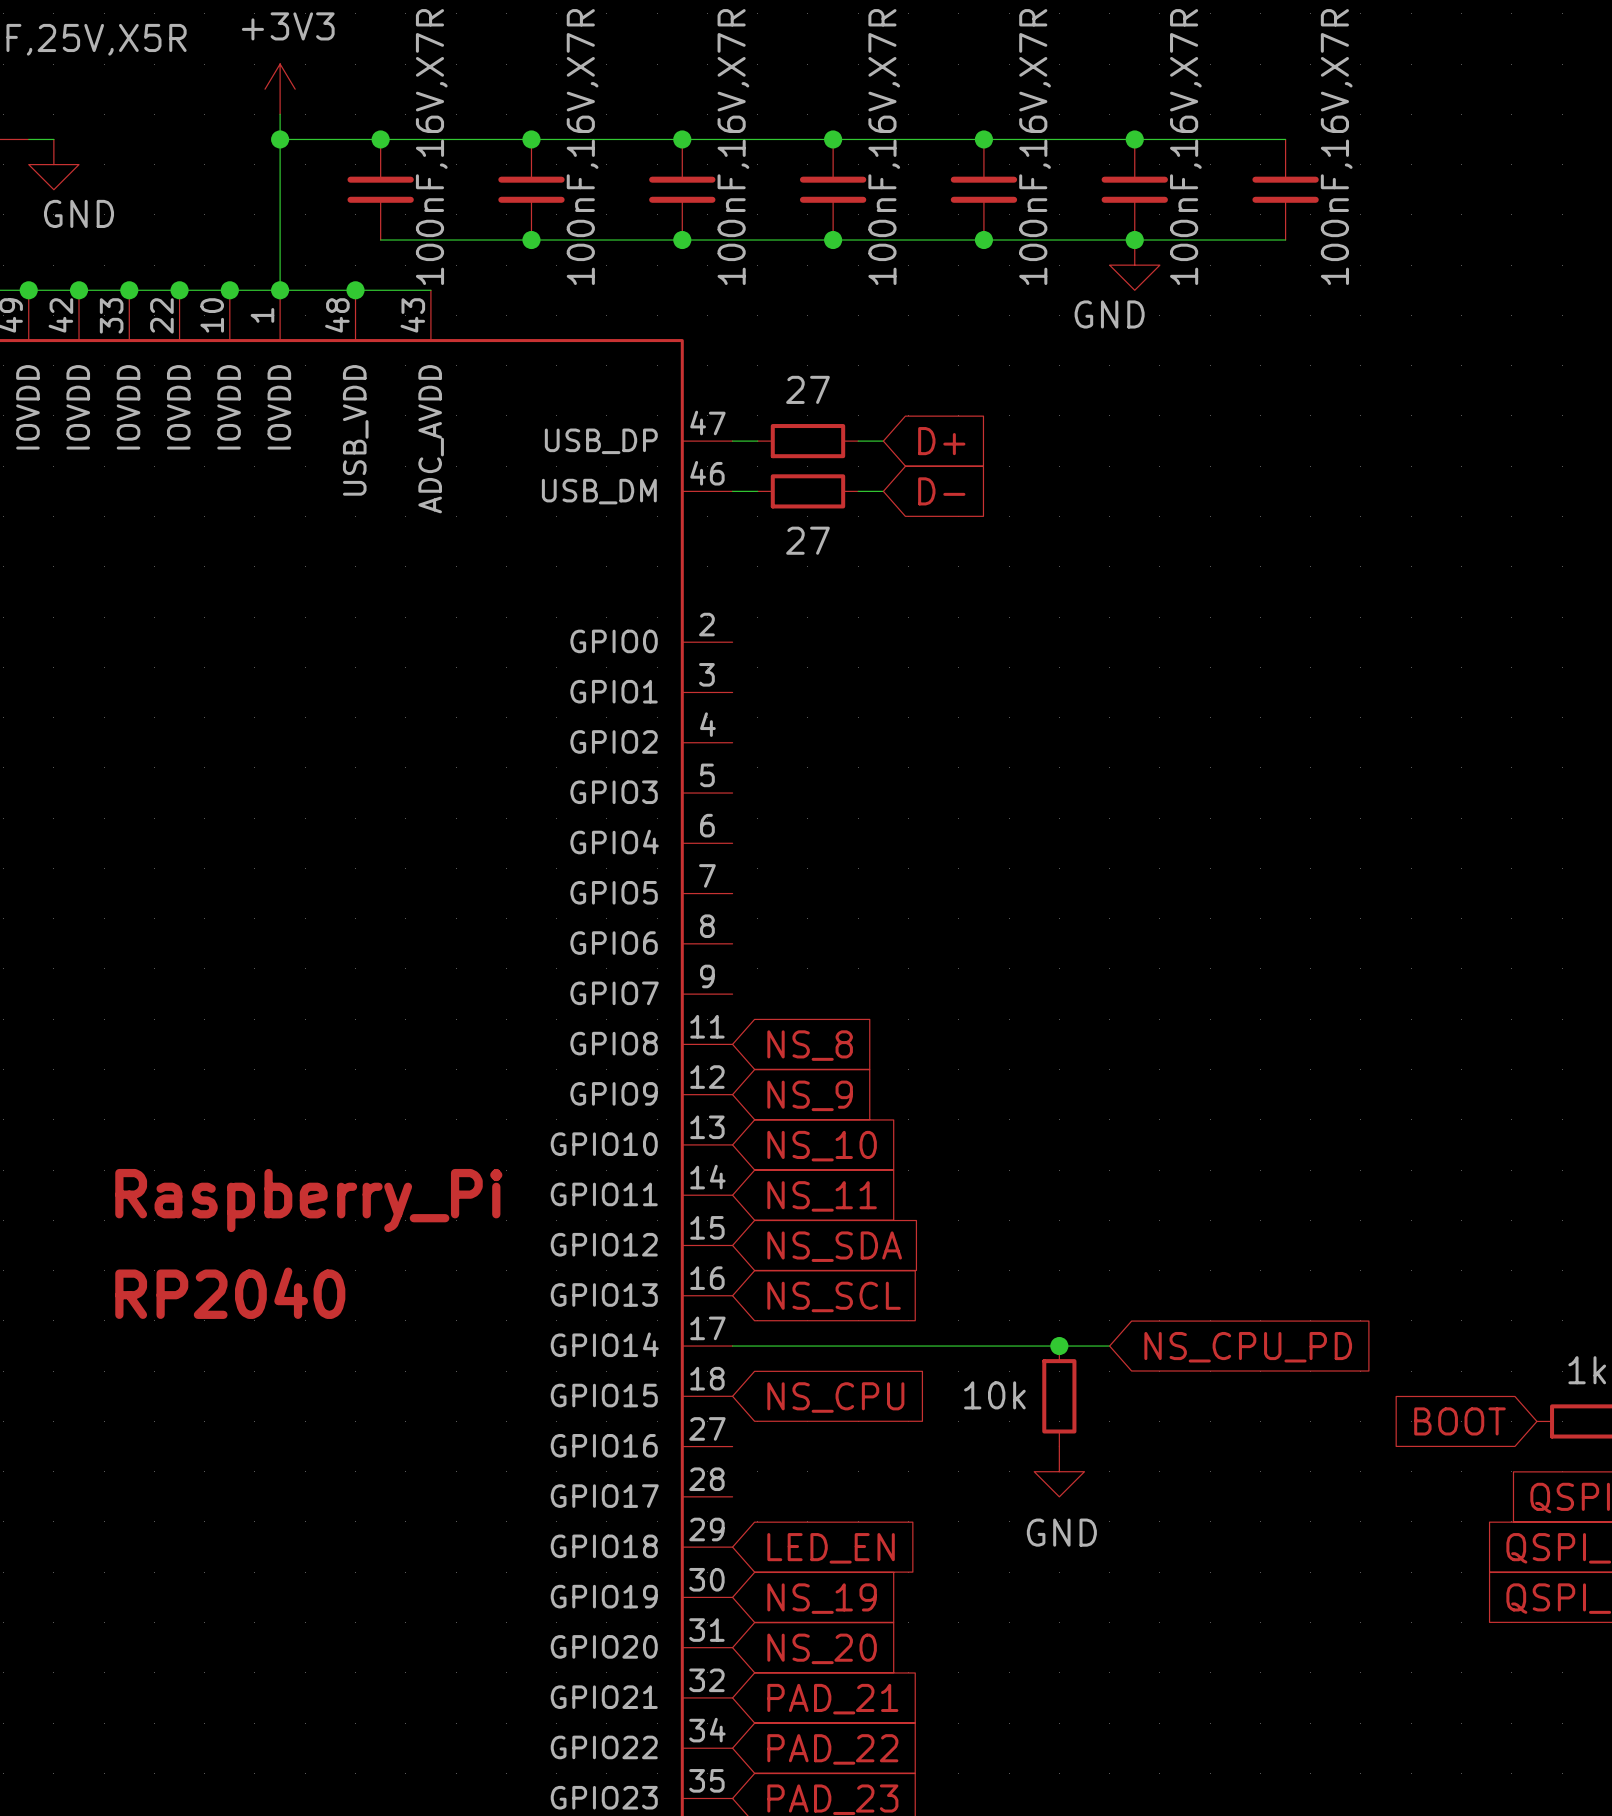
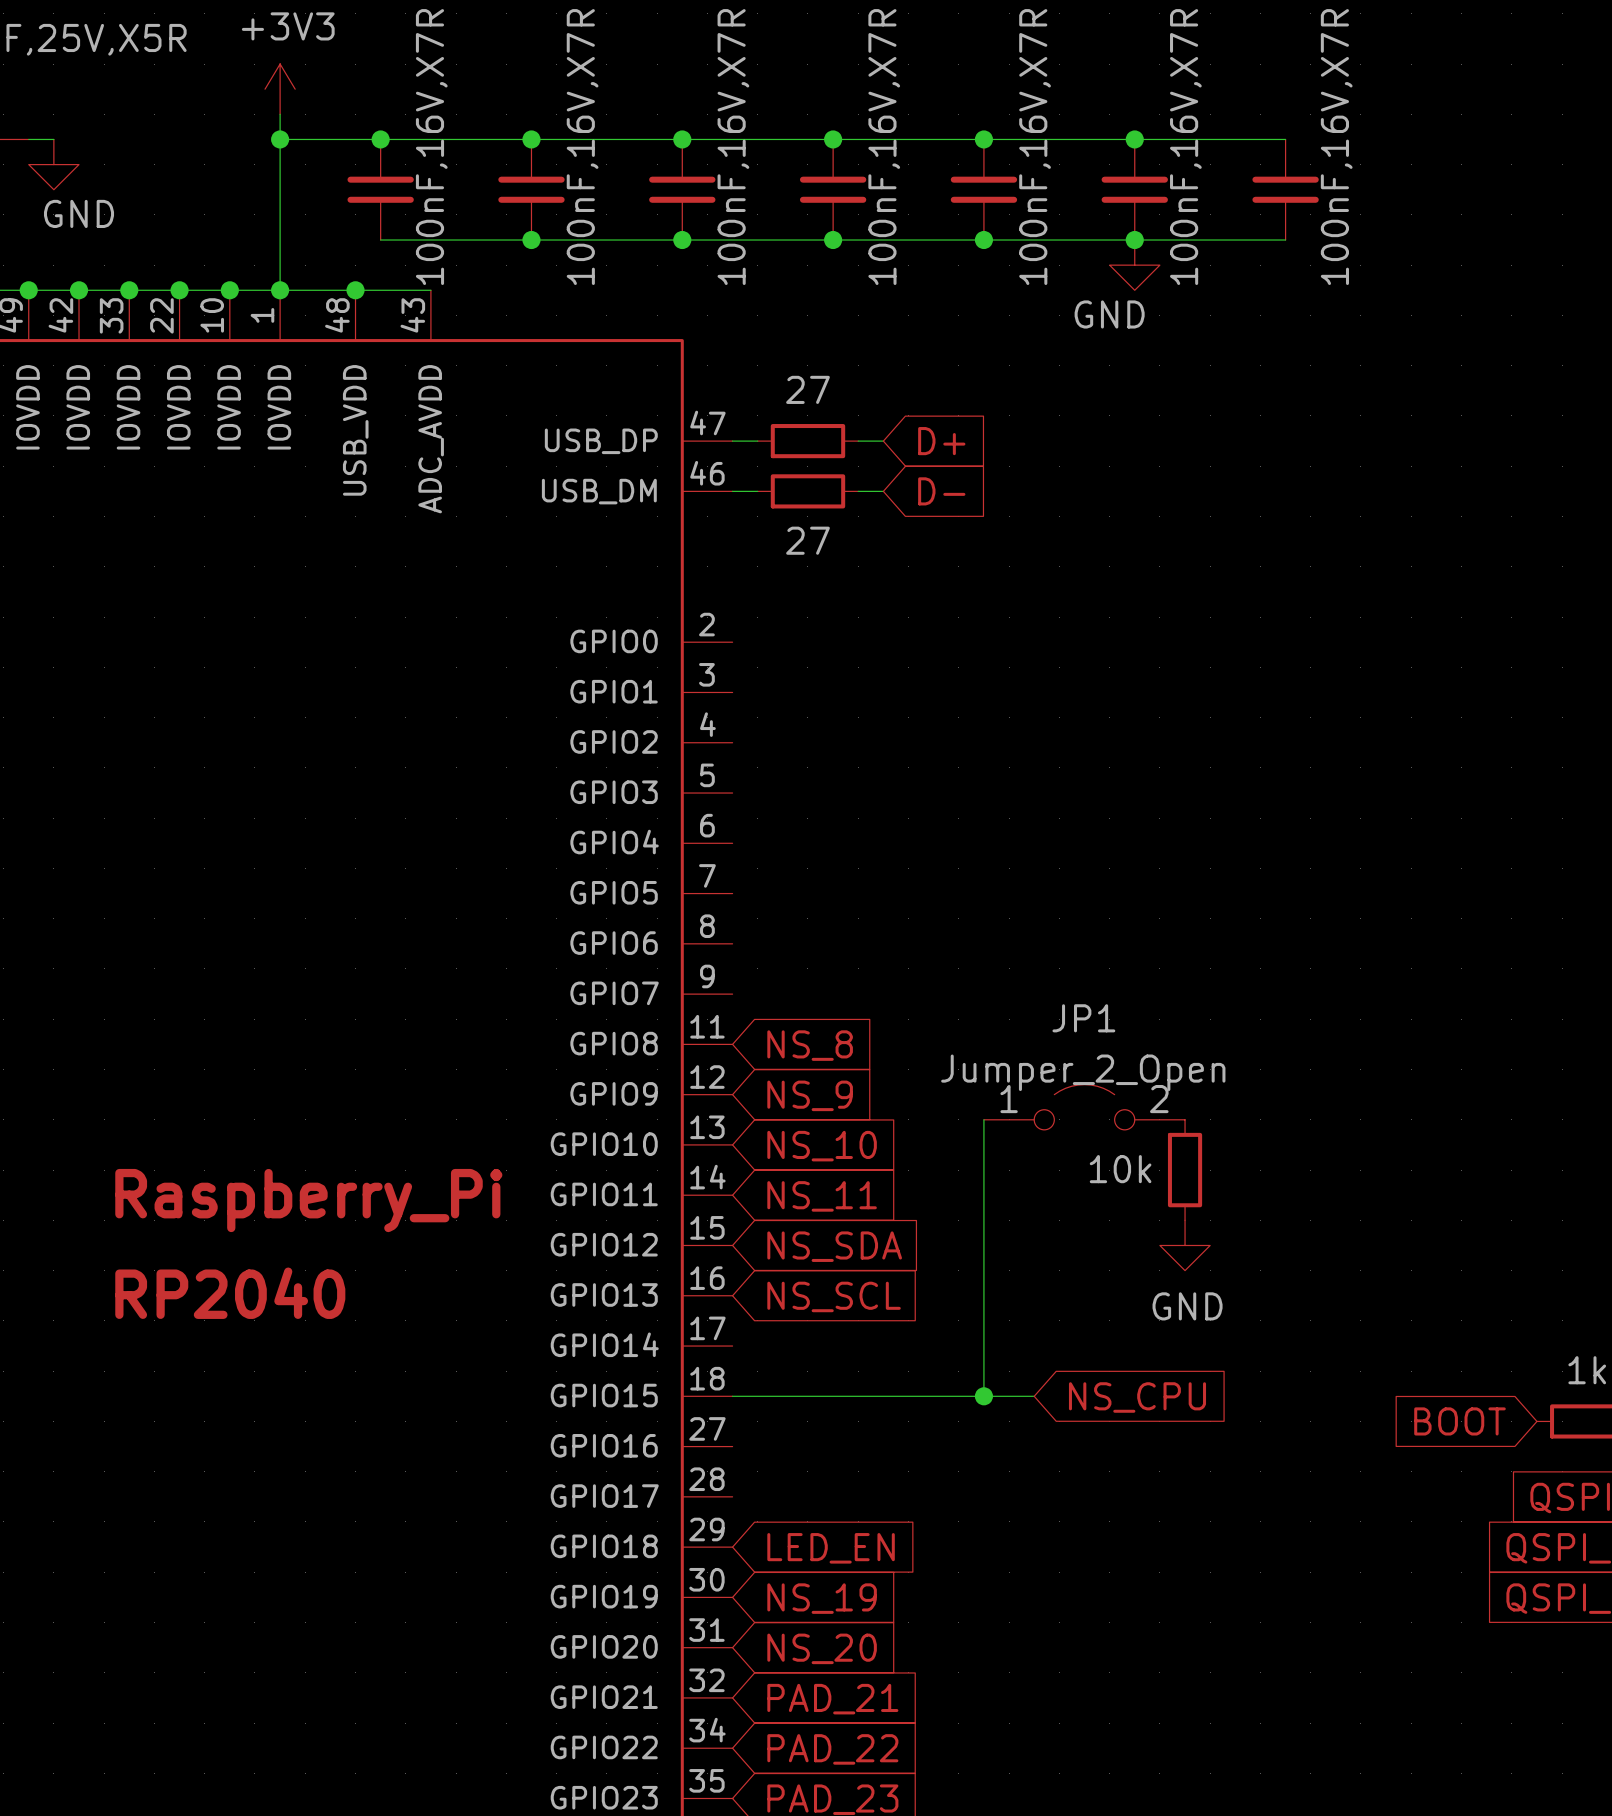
JP1: none -> Jumper_2_Open (1084, 1107)
wire: none -> (983, 1119) (983, 1396)
wire: (732, 1346) (1109, 1346) -> none
junction position: (1059, 1346) -> (983, 1396)
global label: NS_CPU_PD (1248, 1347) -> none
wire: none -> (732, 1396) (1034, 1396)
part position: (1059, 1396) -> (1185, 1170)
global label position: NS_CPU (835, 1397) -> NS_CPU (1137, 1397)
power symbol position: GND (1059, 1471) -> GND (1185, 1245)

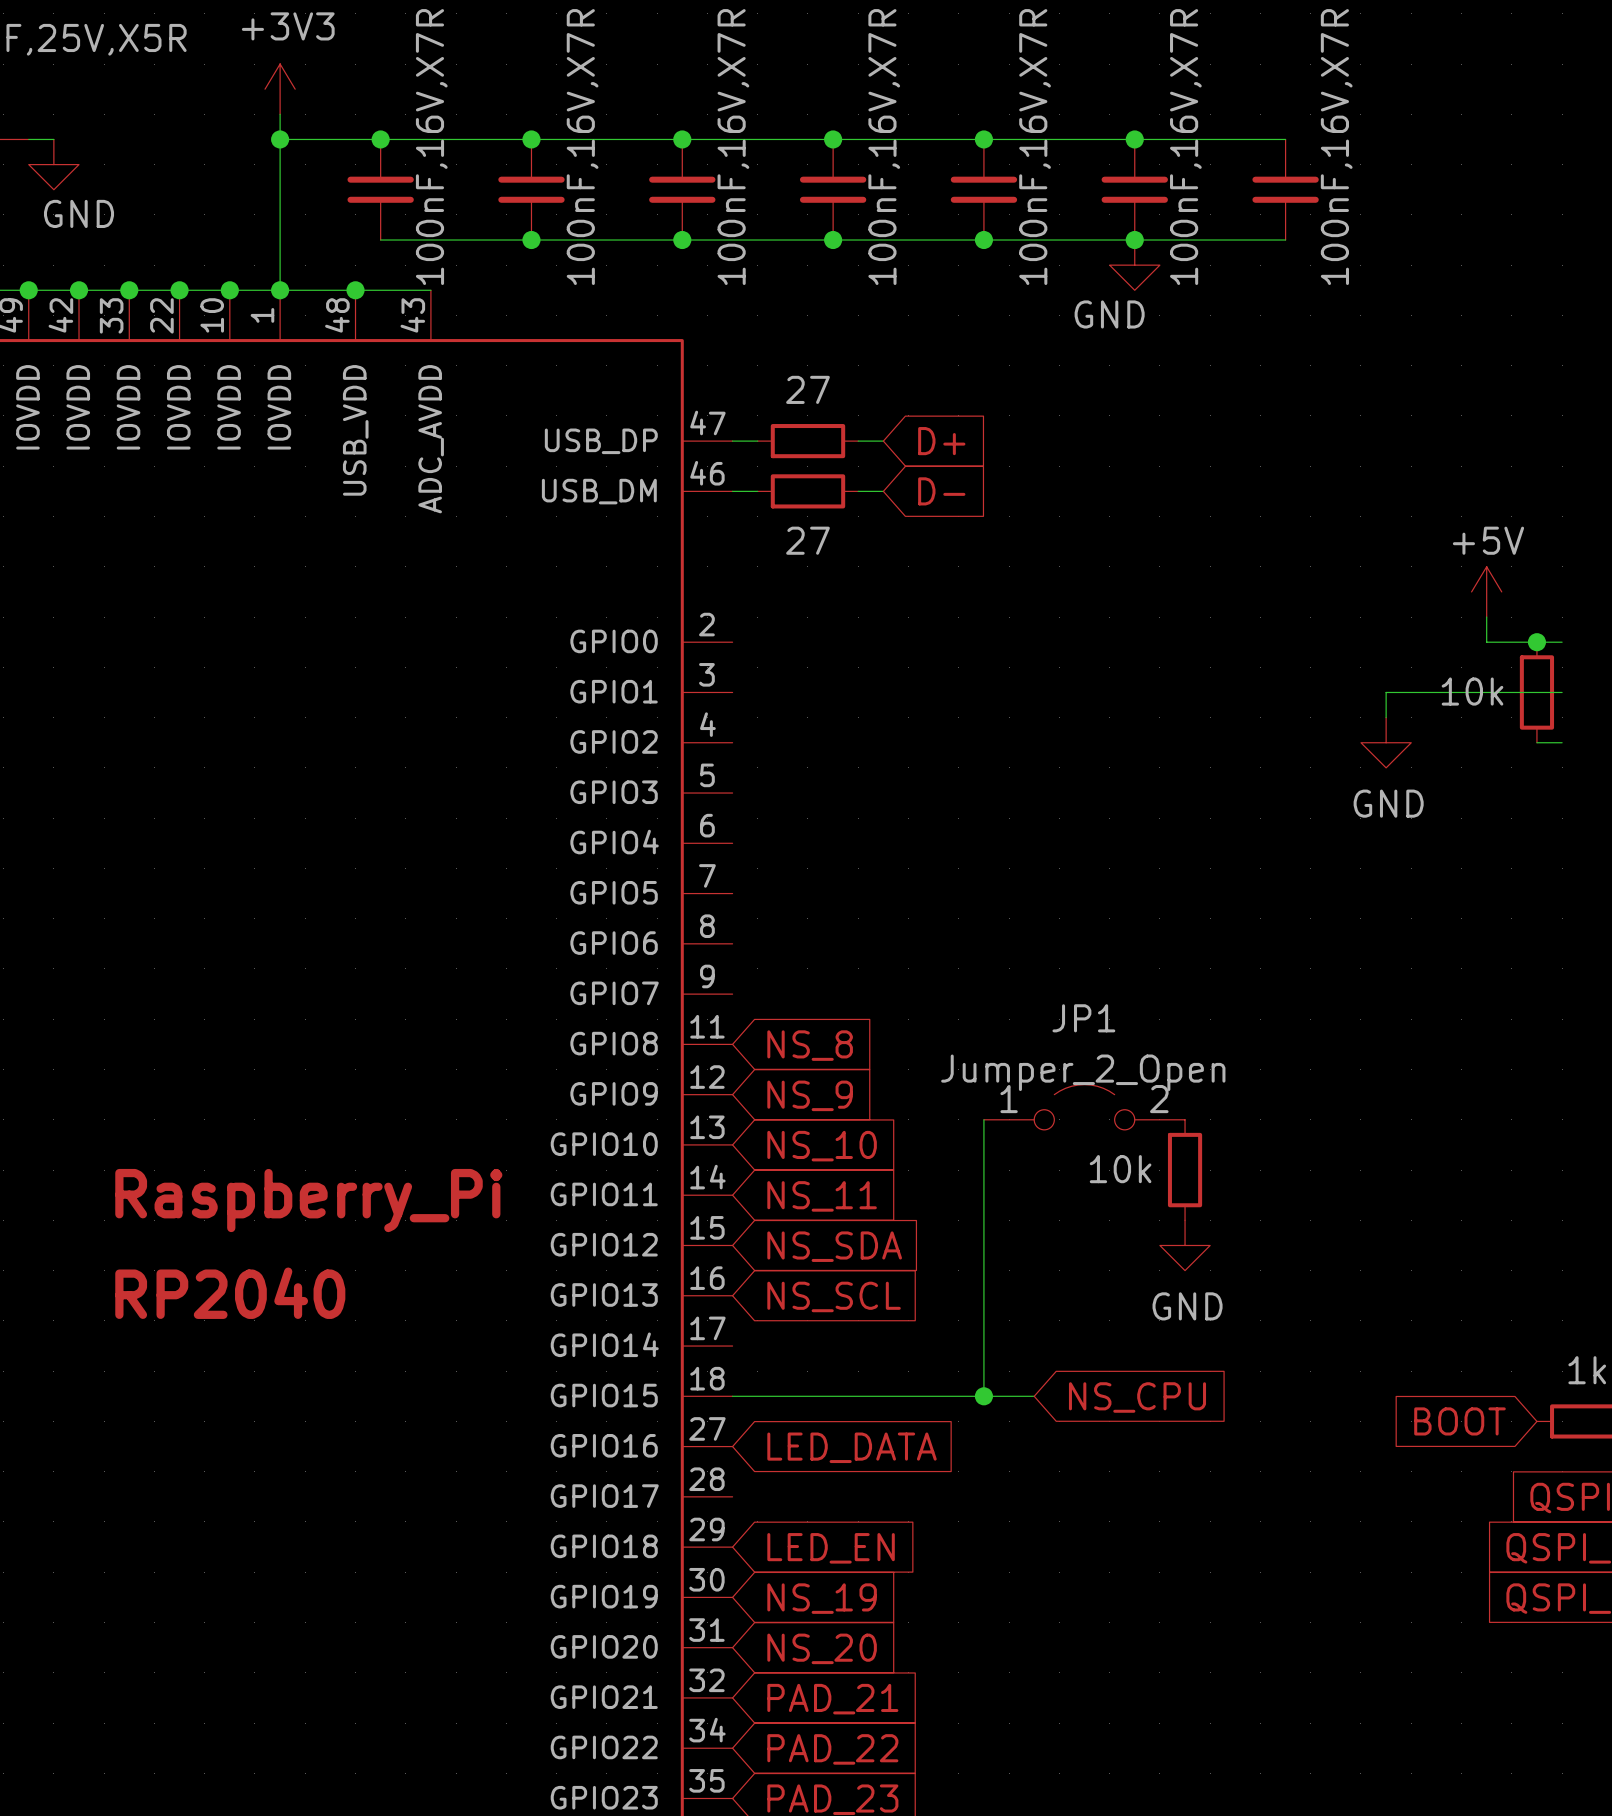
power symbol: none -> +5V (1486, 591)
wire: none -> (1486, 617) (1486, 642) (1562, 642)
junction: none -> (1536, 642)
part: none -> 10k (1536, 692)
wire: none -> (1562, 692) (1386, 692) (1386, 717)
power symbol: none -> GND (1386, 742)
wire: none -> (1536, 742) (1562, 742)
global label: none -> LED_DATA (852, 1447)

